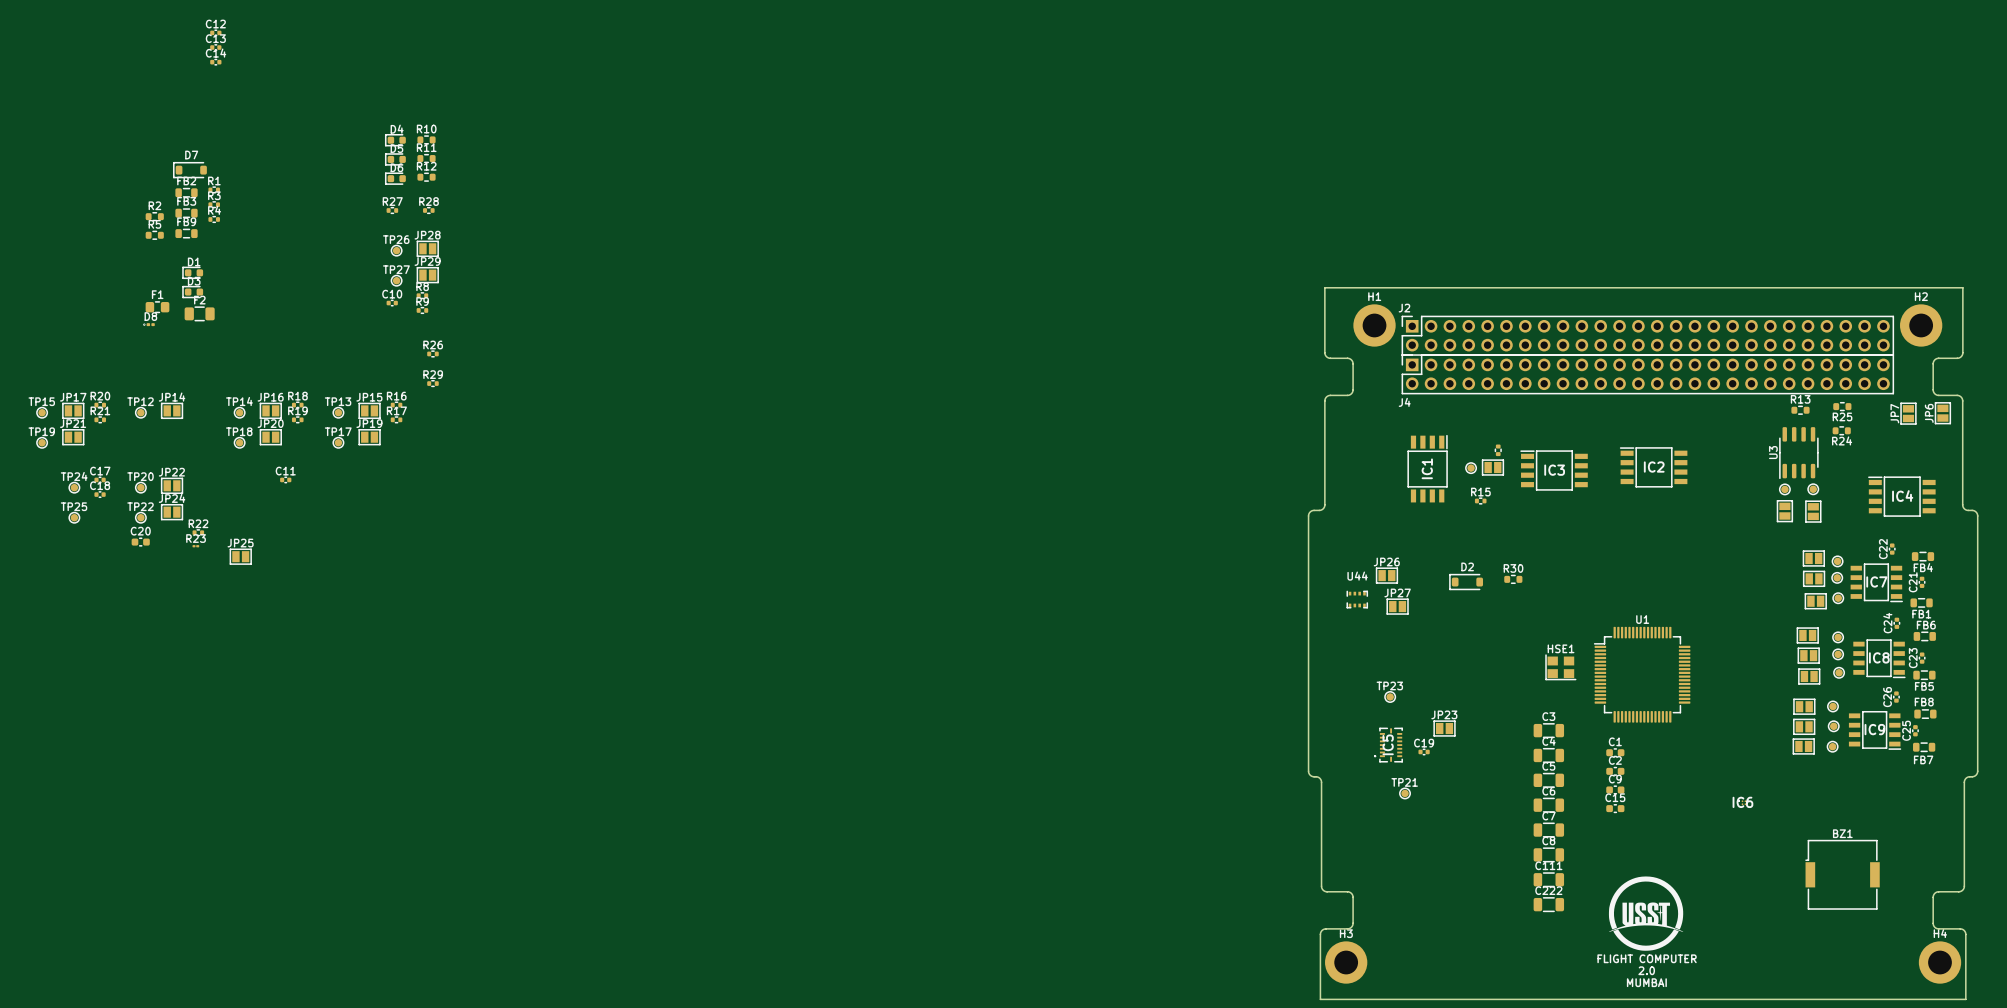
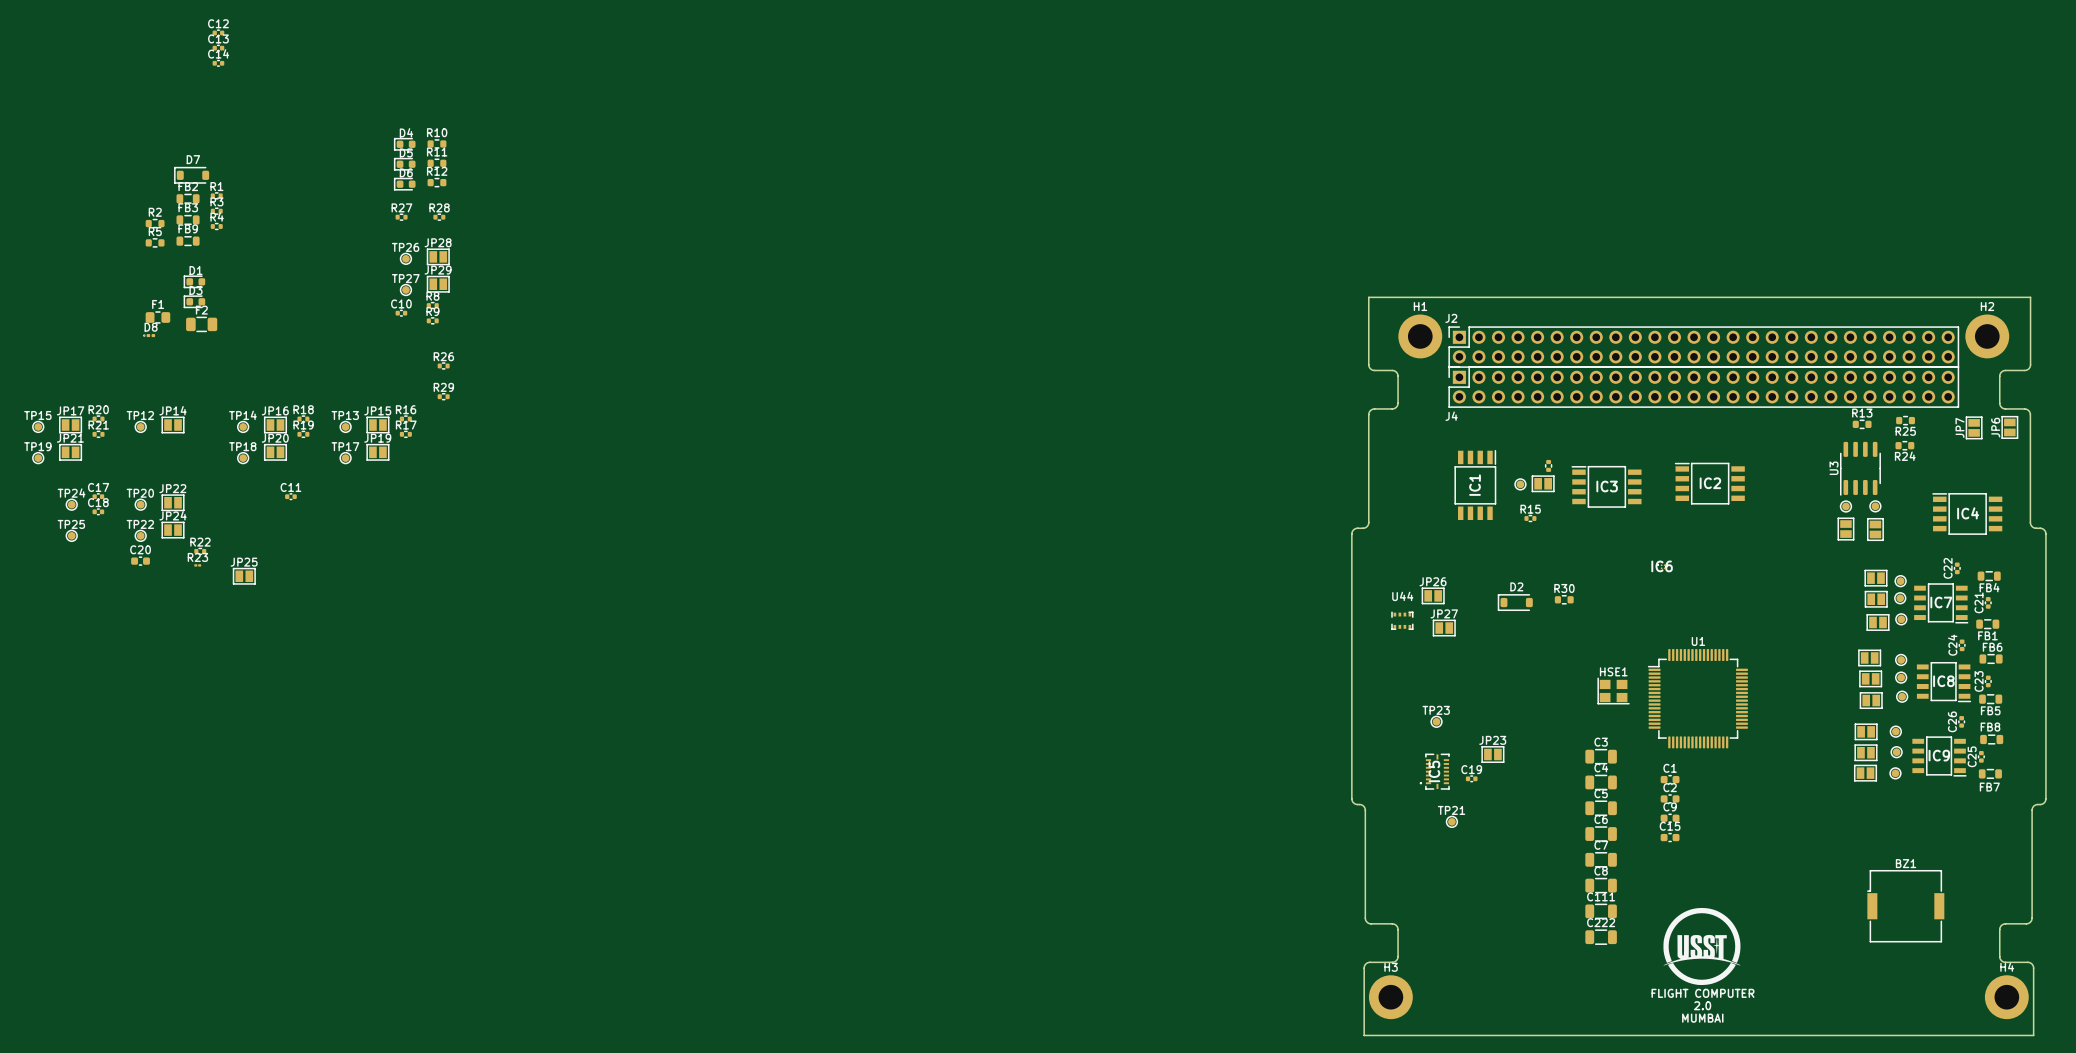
IC6 position: (1742, 802) -> (1661, 566)

